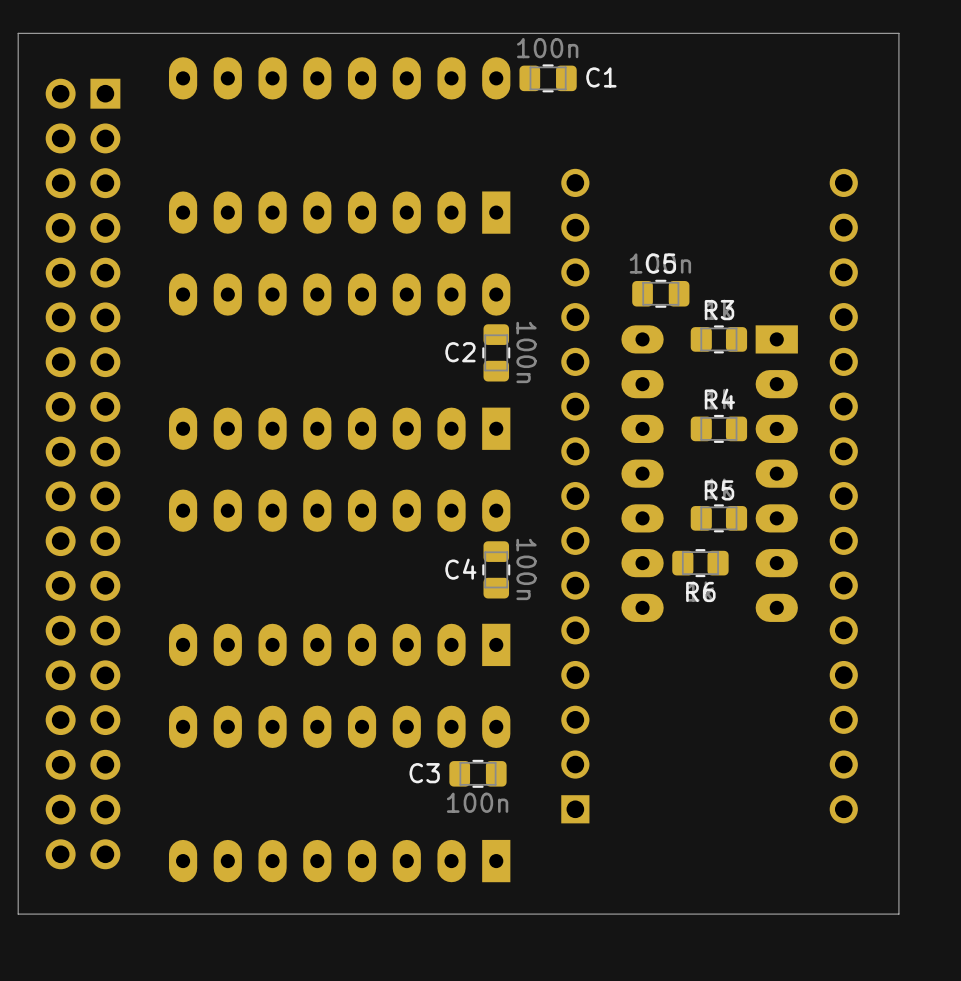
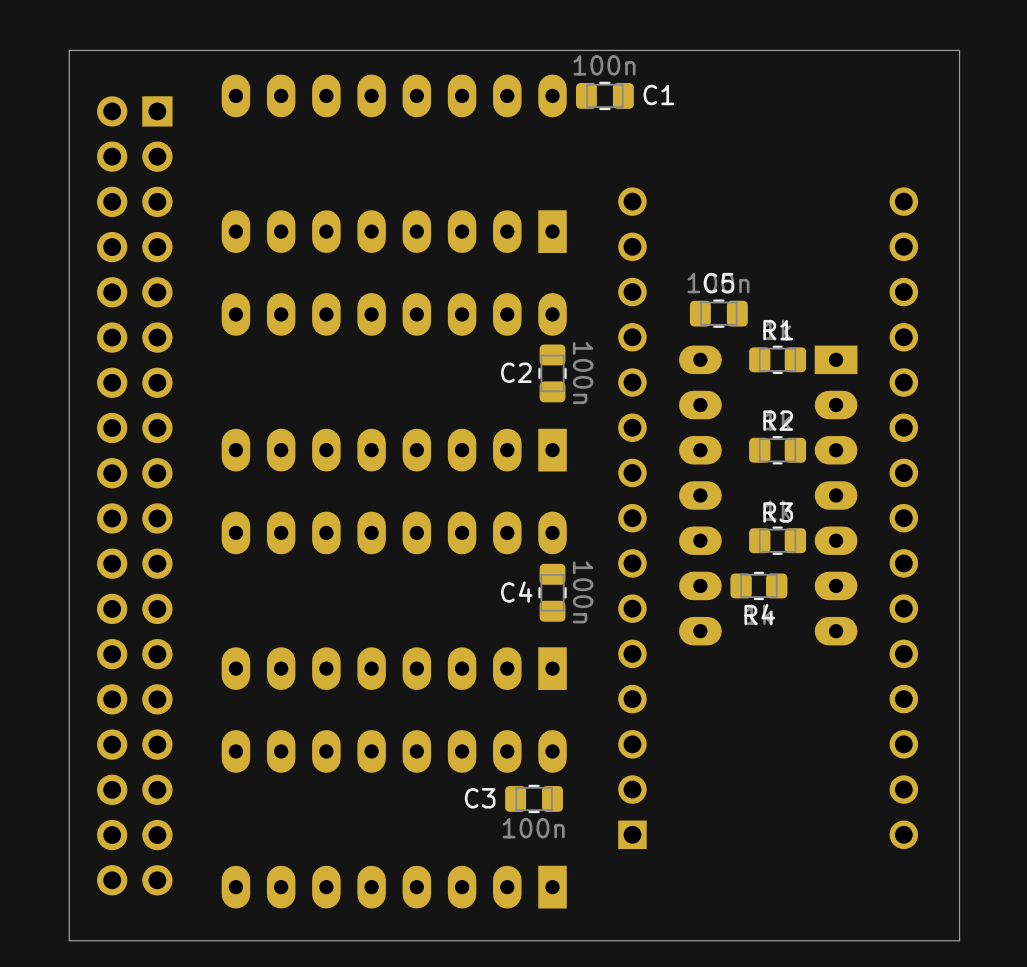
R3 name: R3 (719, 310) -> R1 (778, 330)
R4 name: R4 (719, 399) -> R2 (778, 420)
R5 name: R5 (719, 490) -> R3 (778, 512)
R6 name: R6 (700, 591) -> R4 (759, 614)

